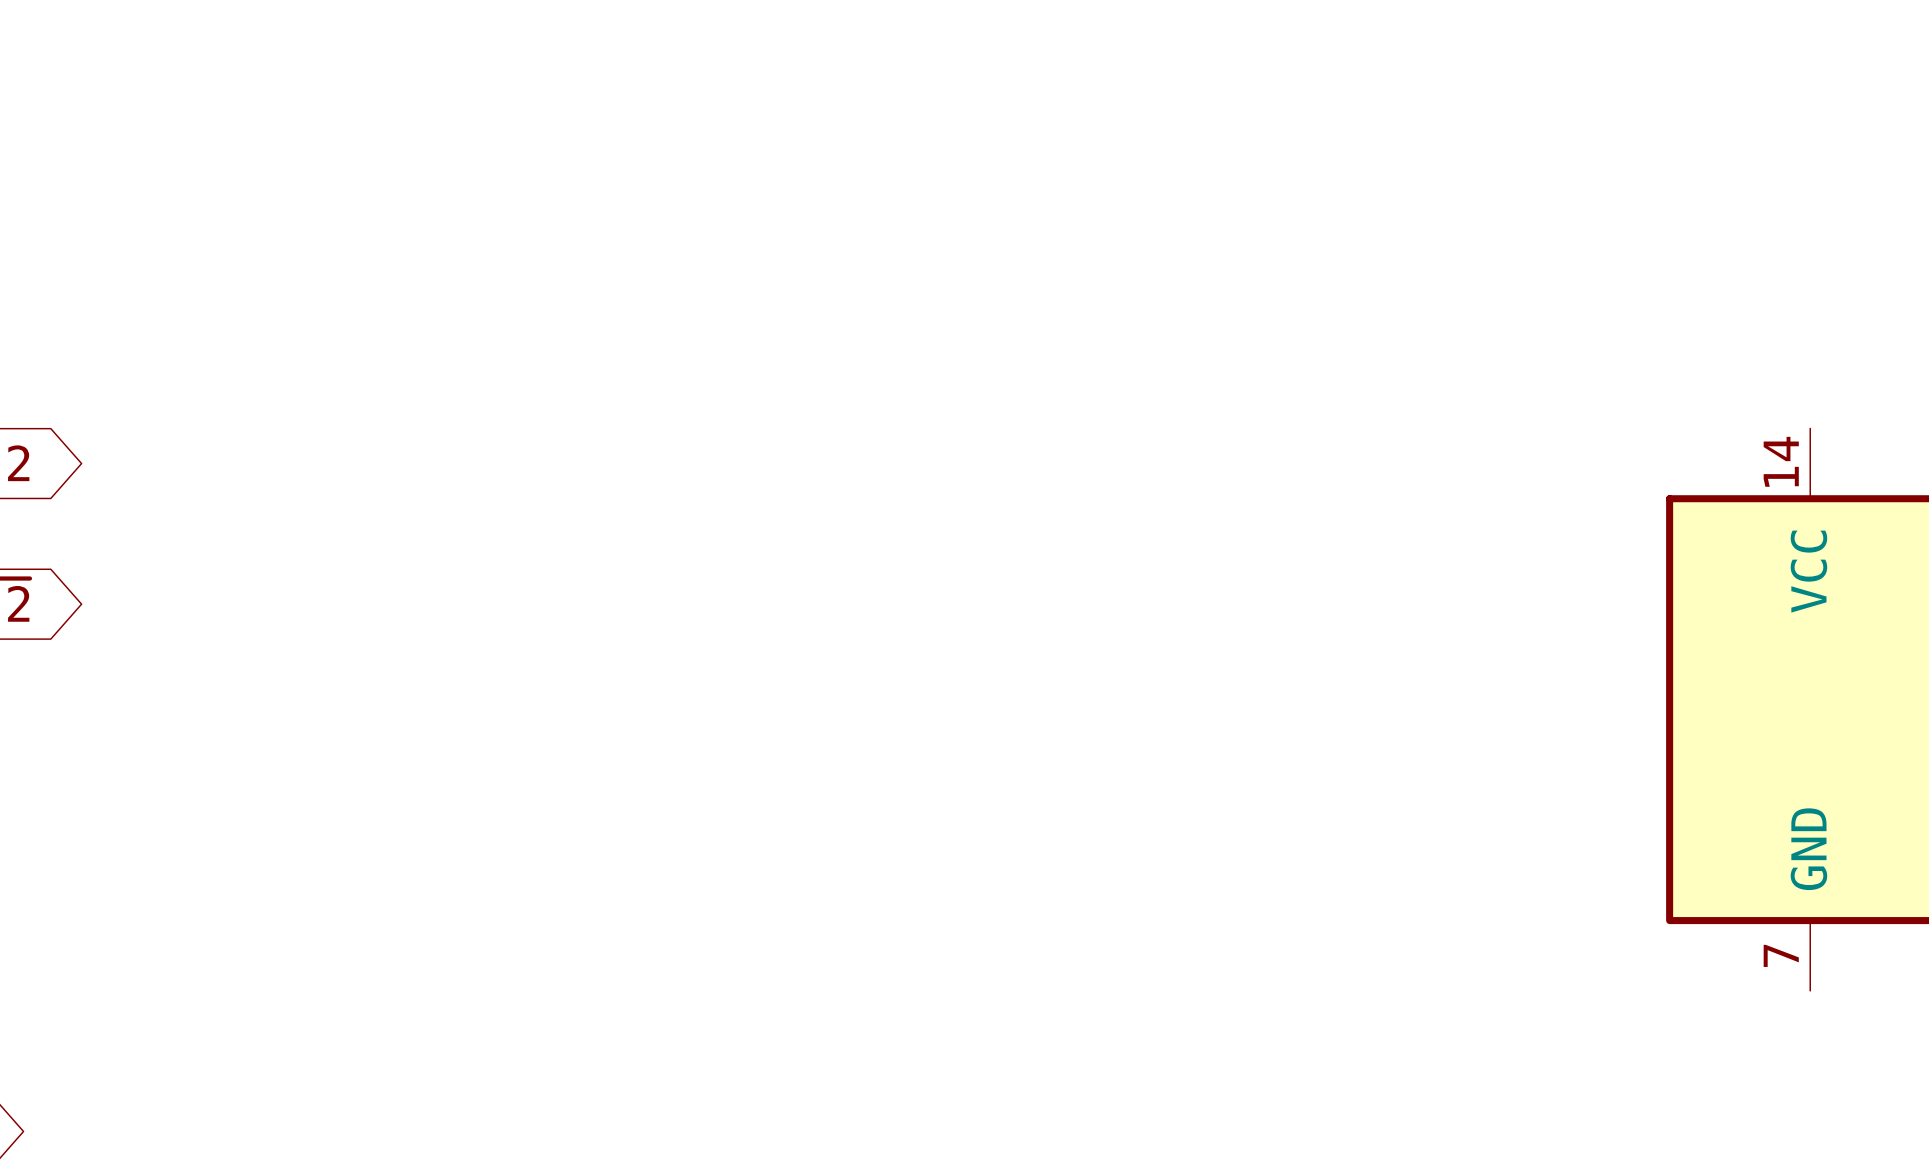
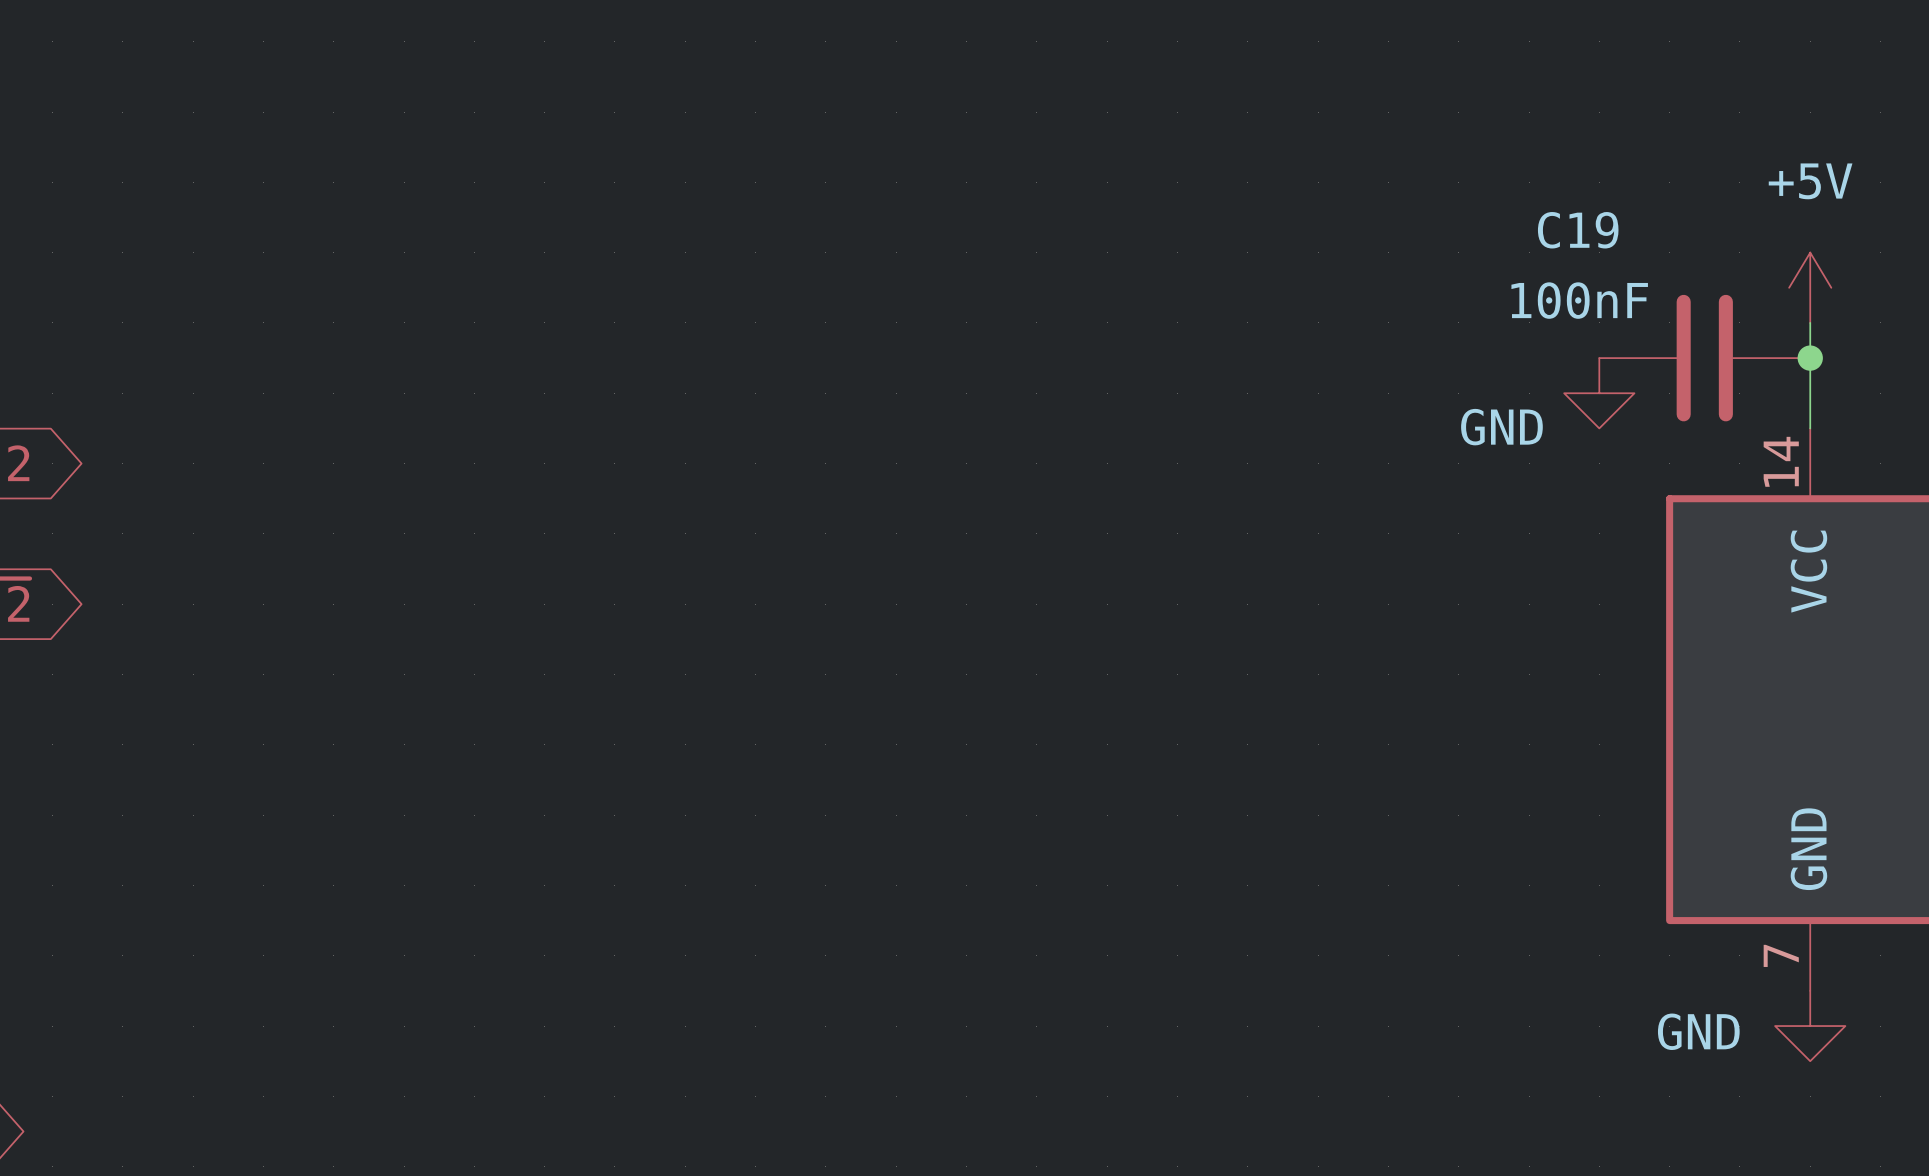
power symbol: none -> +5V (1810, 287)
wire: none -> (1810, 322) (1810, 428)
C19: none -> 100nF (1704, 358)
junction: none -> (1810, 358)
power symbol: none -> GND (1599, 393)
power symbol: none -> GND (1810, 1026)

